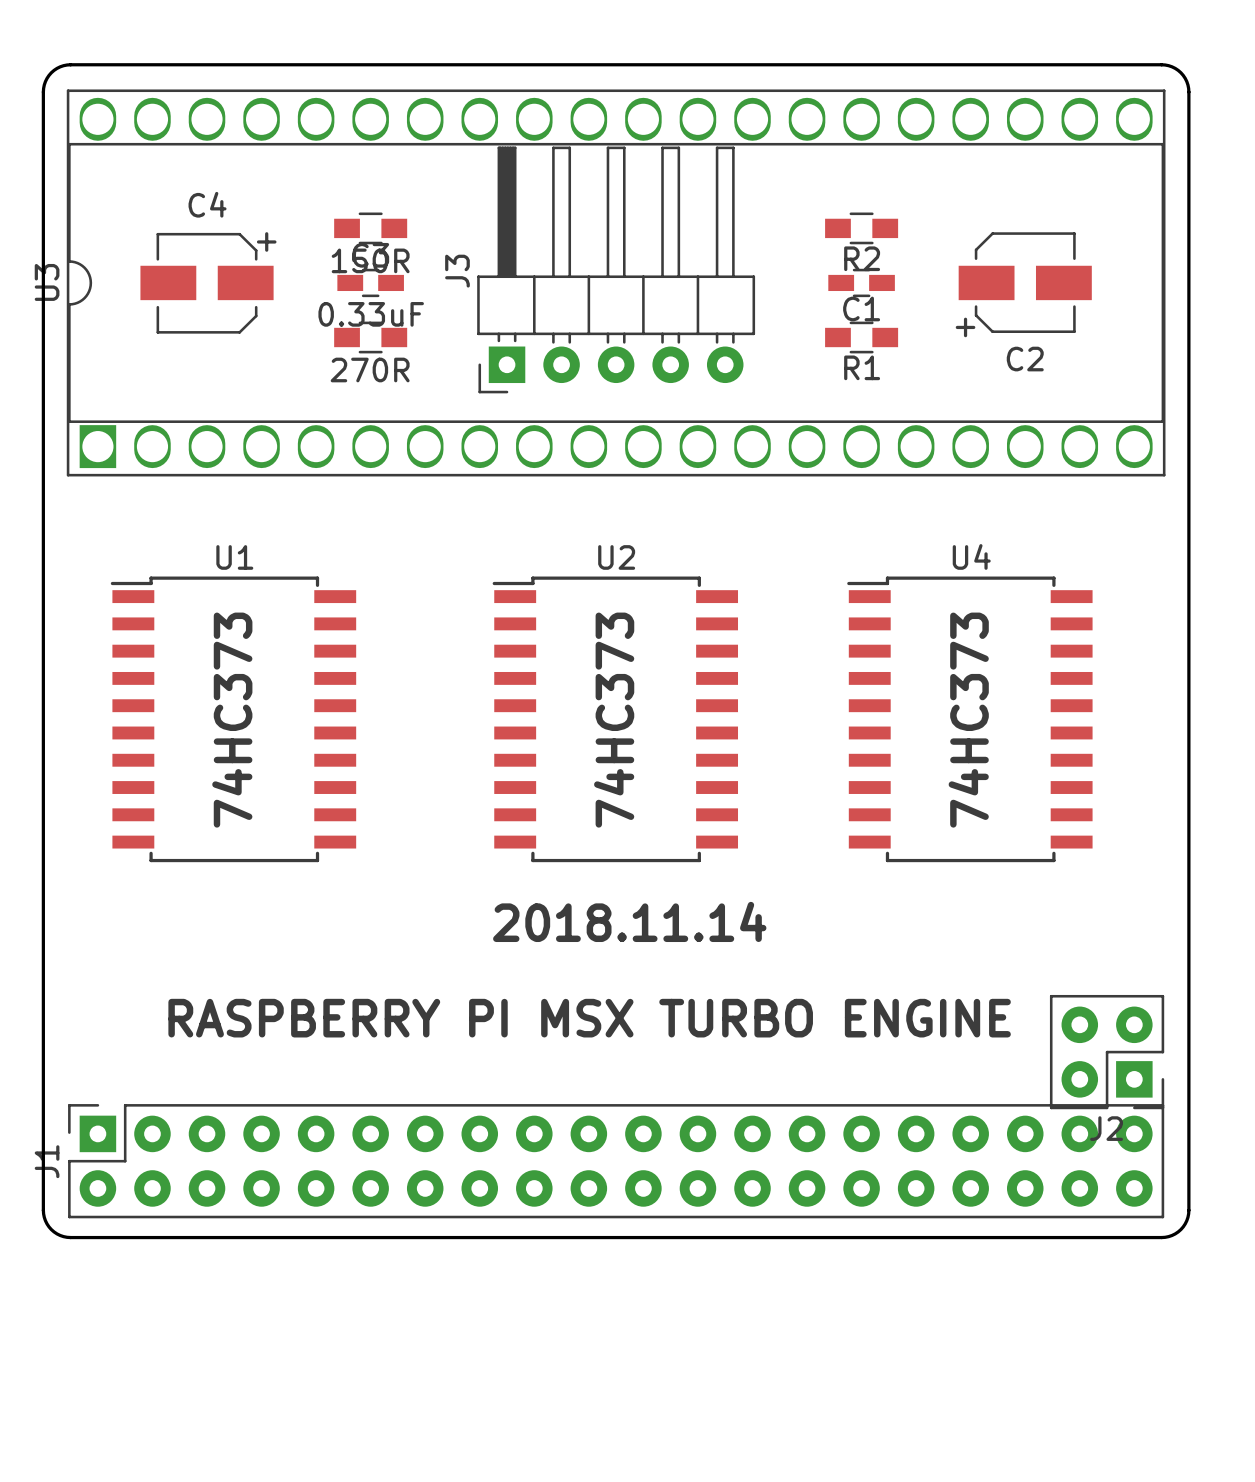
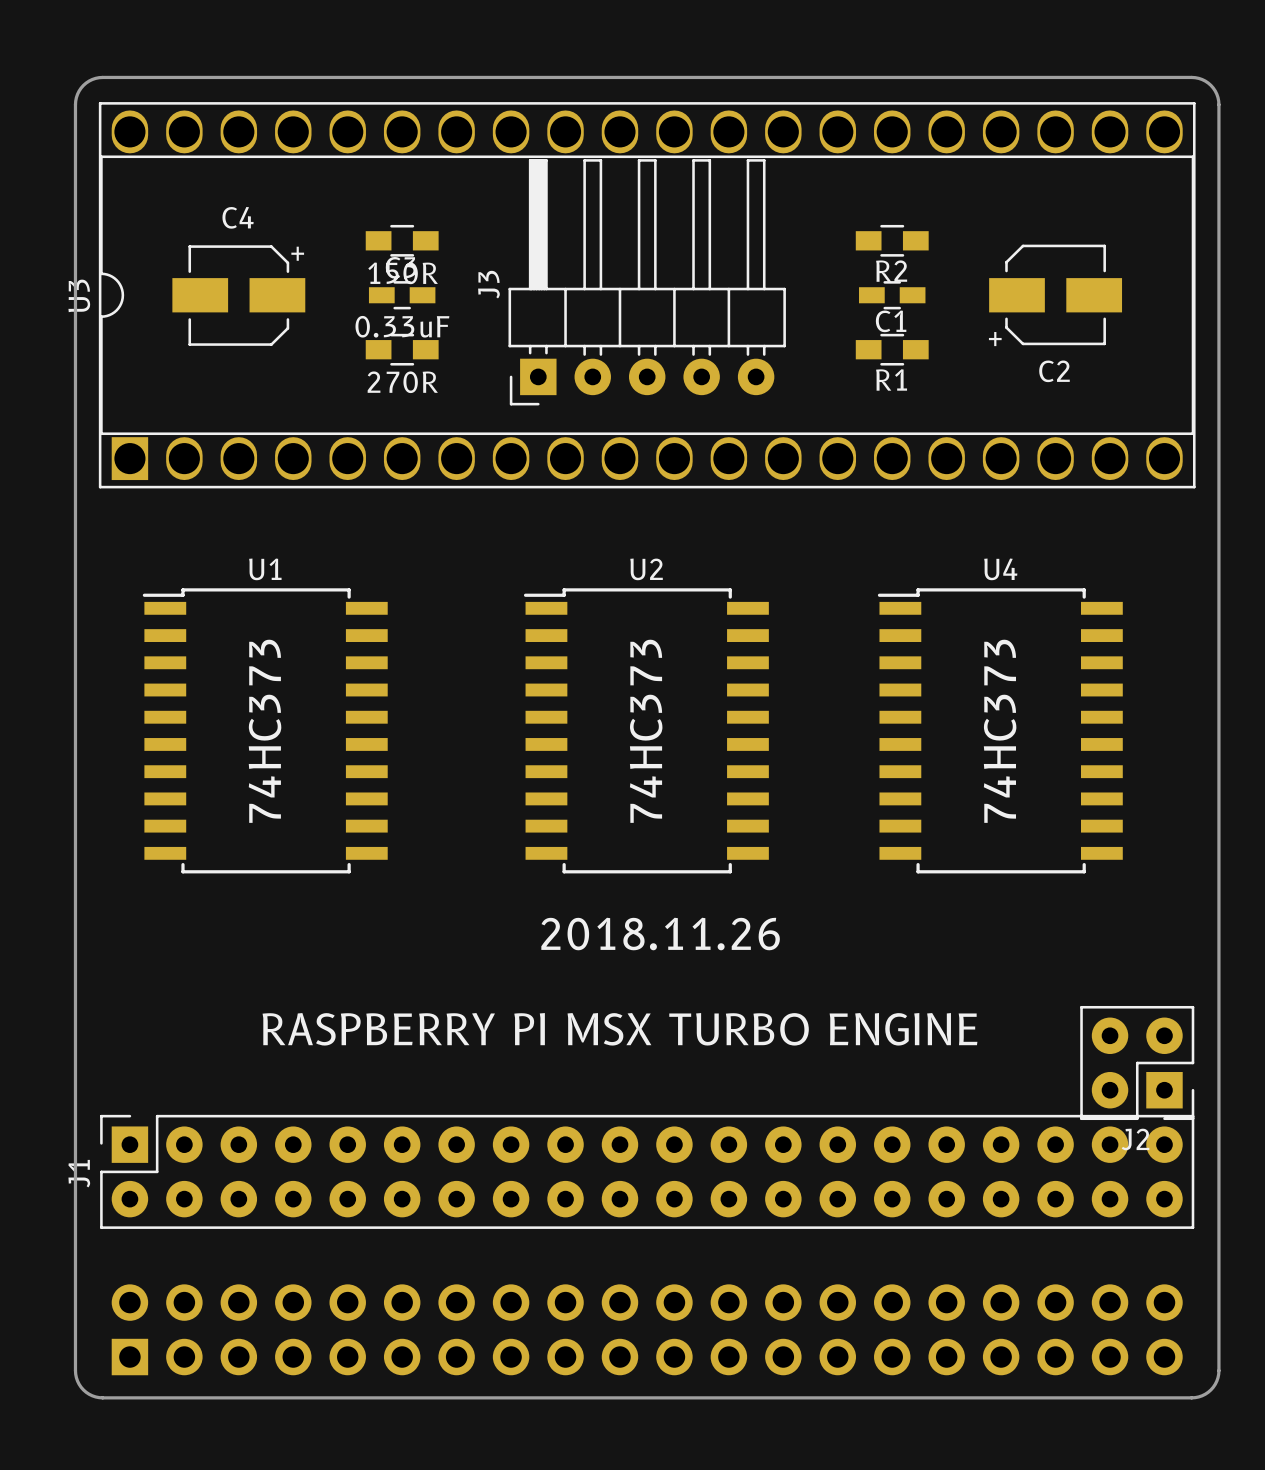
text: 2018.11.14 (629, 921) -> 2018.11.26 (660, 934)
board edge: (43, 1210) (45, 1220) (51, 1229) (60, 1235) (70, 1237) (1161, 1237) (1172, 1235) (1180, 1229) (1186, 1220) (1188, 1210) -> (75, 1220) (75, 1374) (83, 1389) (99, 1397) (1191, 1397)
board edge: none -> (1218, 1220) (1218, 1374) (1215, 1384) (1208, 1392) (1191, 1397)
part: none -> (647, 1329)

